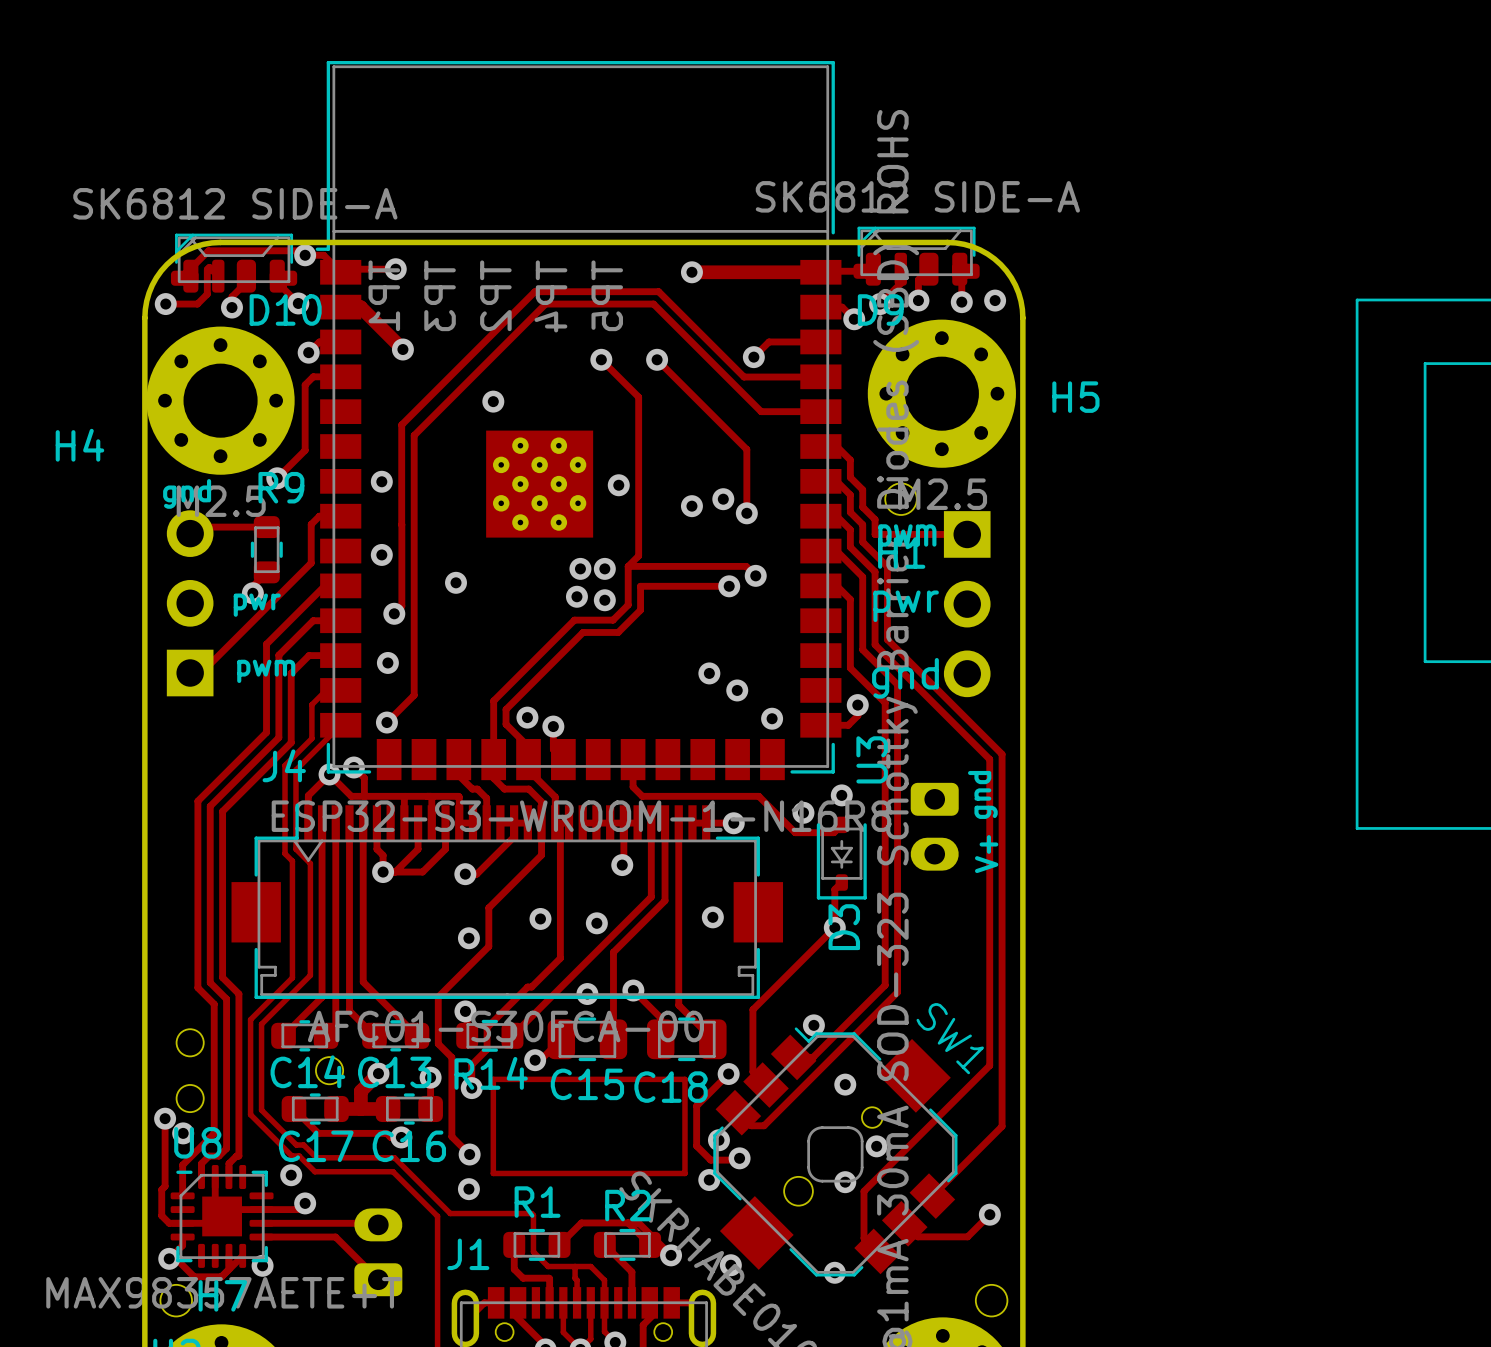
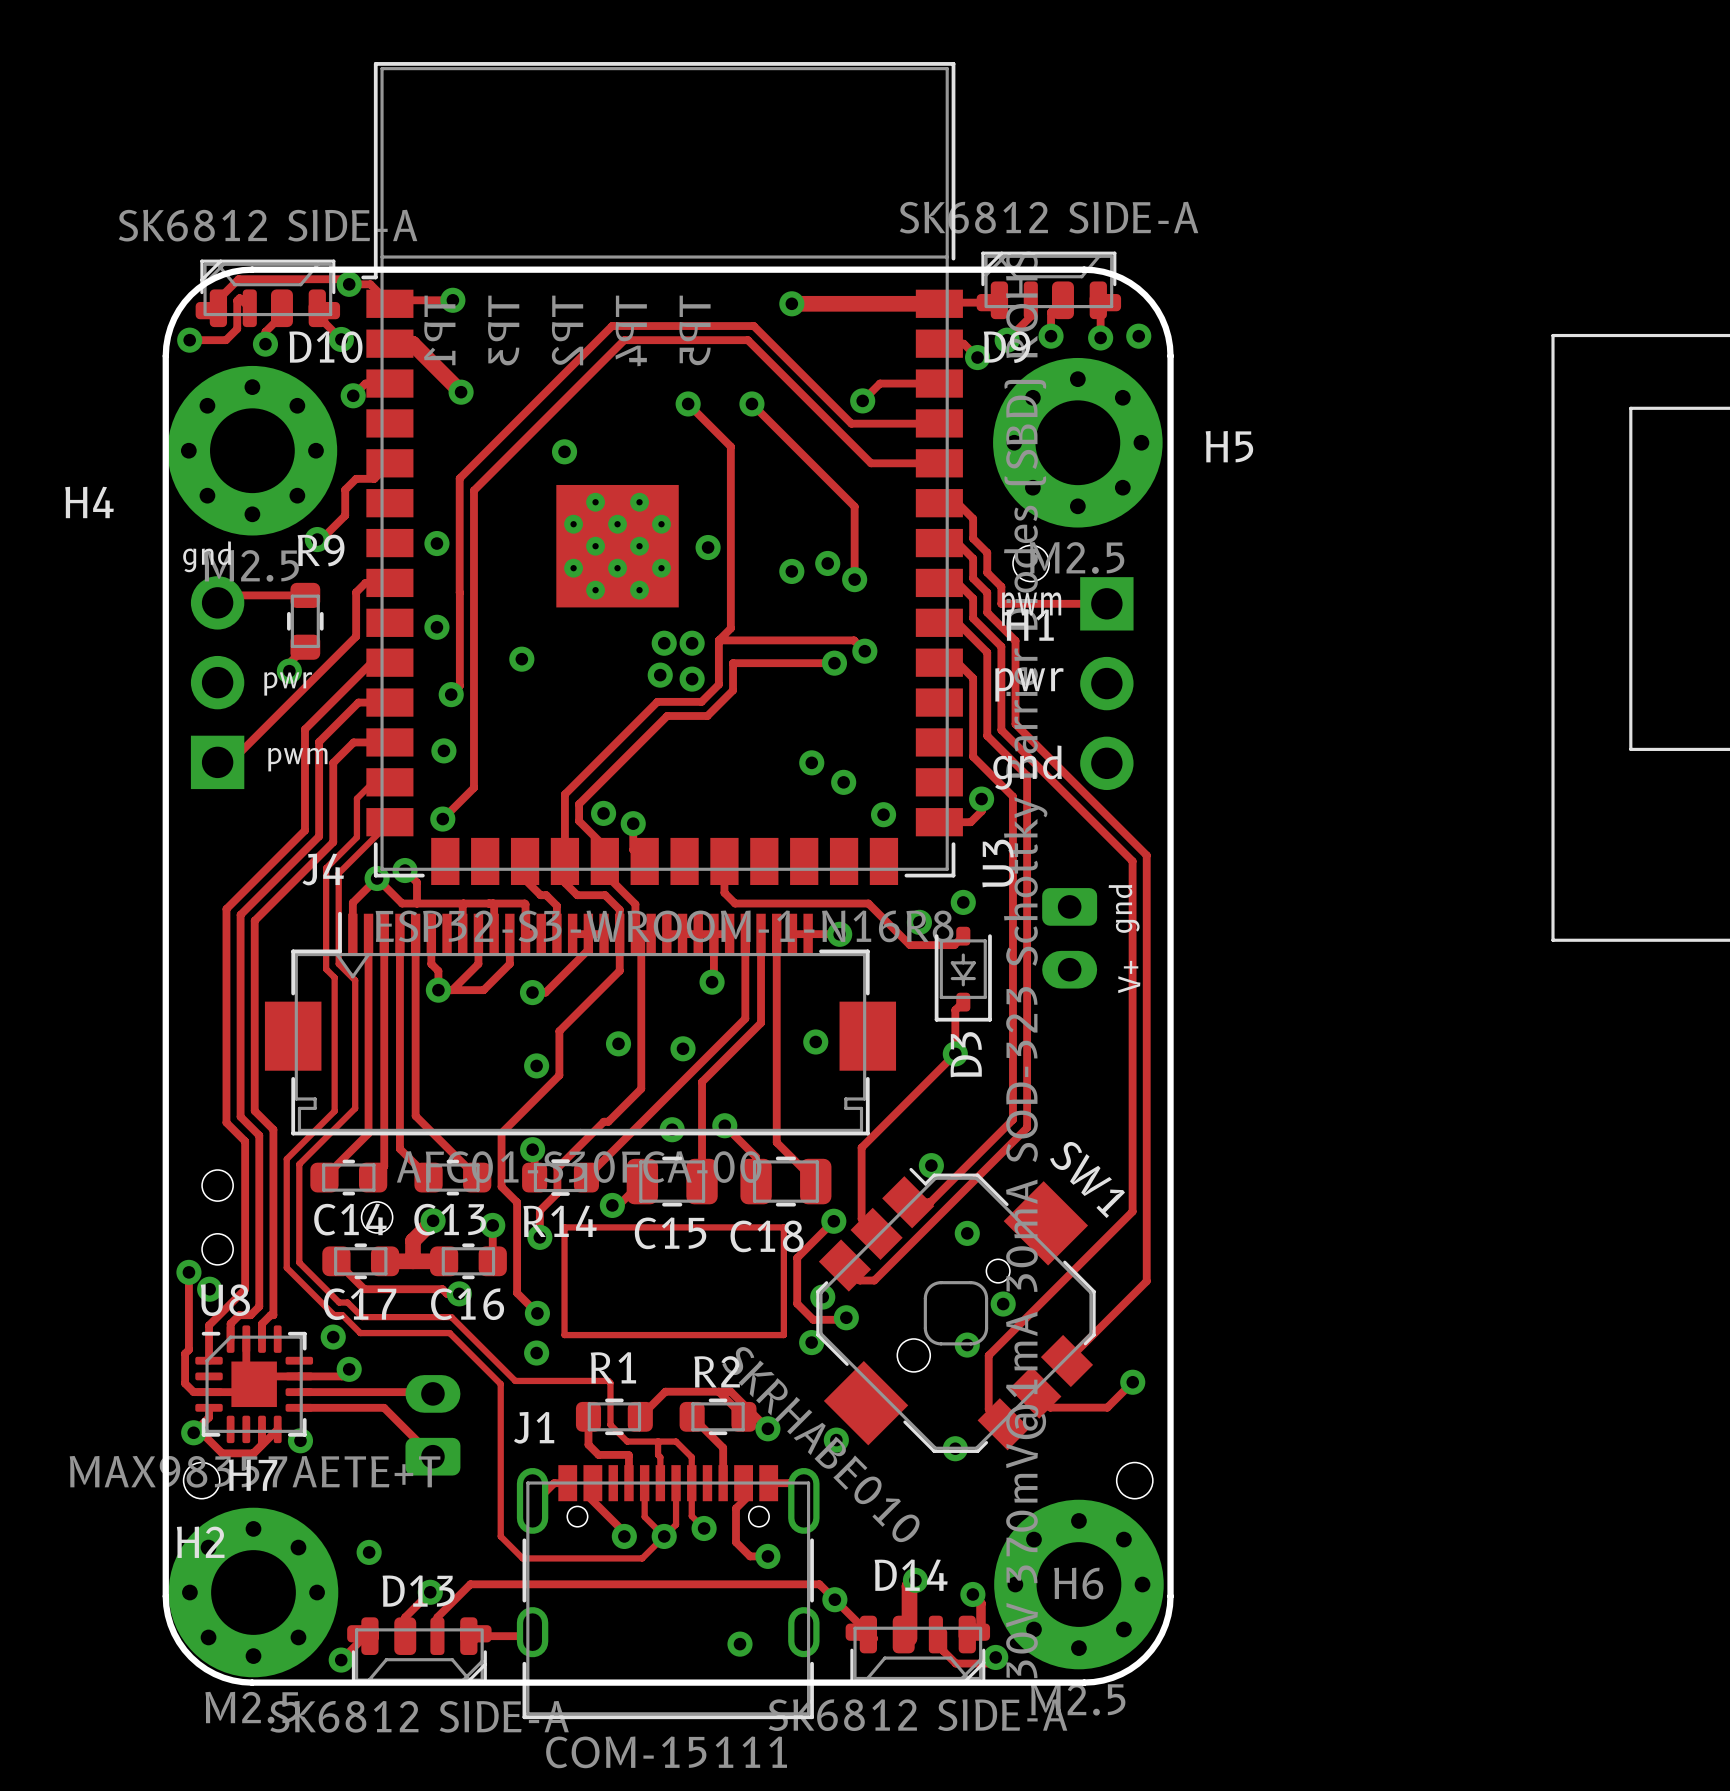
track: (340, 376) (313, 376) (305, 384) (305, 450) (277, 478) -> (389, 463) (374, 478) (356, 478) (345, 489) (345, 515) (321, 539) (317, 539)

